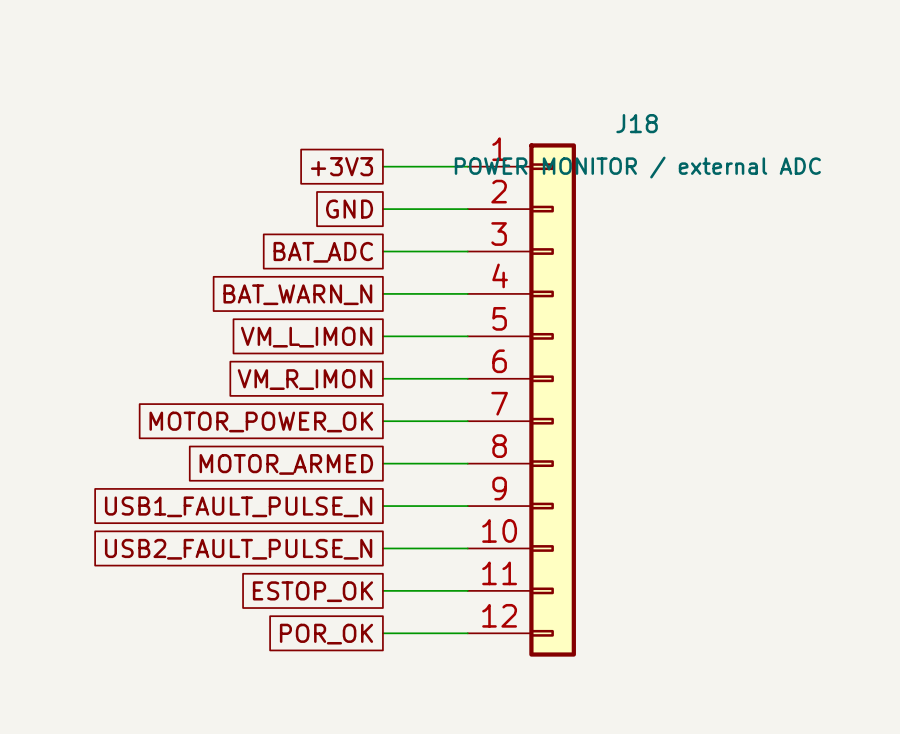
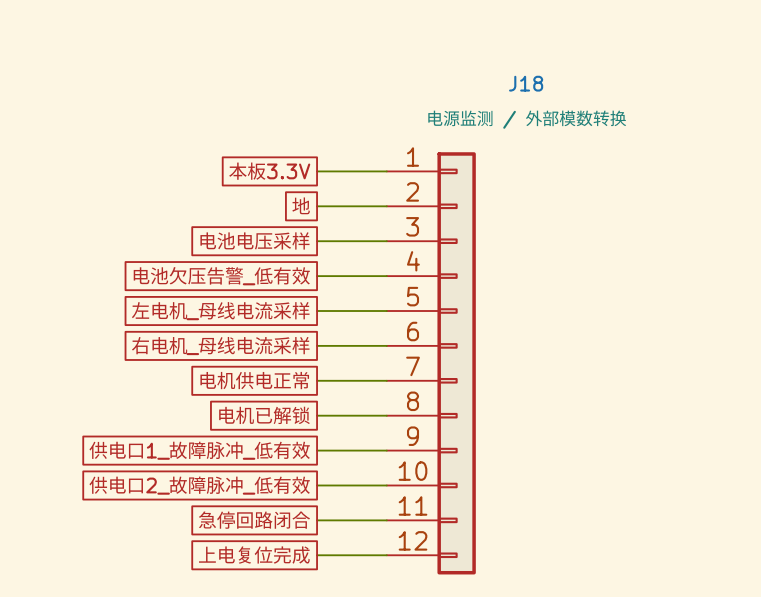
J18 name position: J18 (637, 123) -> J18 (526, 83)
global label: +3V3 (341, 166) -> 本板3.3V (269, 171)
J18 value: POWER MONITOR / external ADC (637, 167) -> 电源监测 / 外部模数转换 (527, 119)
global label: GND (349, 209) -> 地 (301, 205)
global label: BAT_ADC (323, 252) -> 电池电压采样 (254, 240)
global label: BAT_WARN_N (297, 294) -> 电池欠压告警_低有效 (221, 275)
global label: VM_L_IMON (306, 337) -> 左电机_母线电流采样 (220, 310)
global label: VM_R_IMON (305, 379) -> 右电机_母线电流采样 (220, 345)
global label: MOTOR_POWER_OK (261, 422) -> 电机供电正常 (254, 380)
global label: MOTOR_ARMED (286, 464) -> 电机已解锁 (264, 415)
global label: USB1_FAULT_PULSE_N (238, 506) -> 供电口1_故障脉冲_低有效 (199, 450)
global label: USB2_FAULT_PULSE_N (238, 549) -> 供电口2_故障脉冲_低有效 (199, 485)
global label: ESTOP_OK (312, 591) -> 急停回路闭合 (254, 520)
global label: POR_OK (326, 634) -> 上电复位完成 (254, 555)

